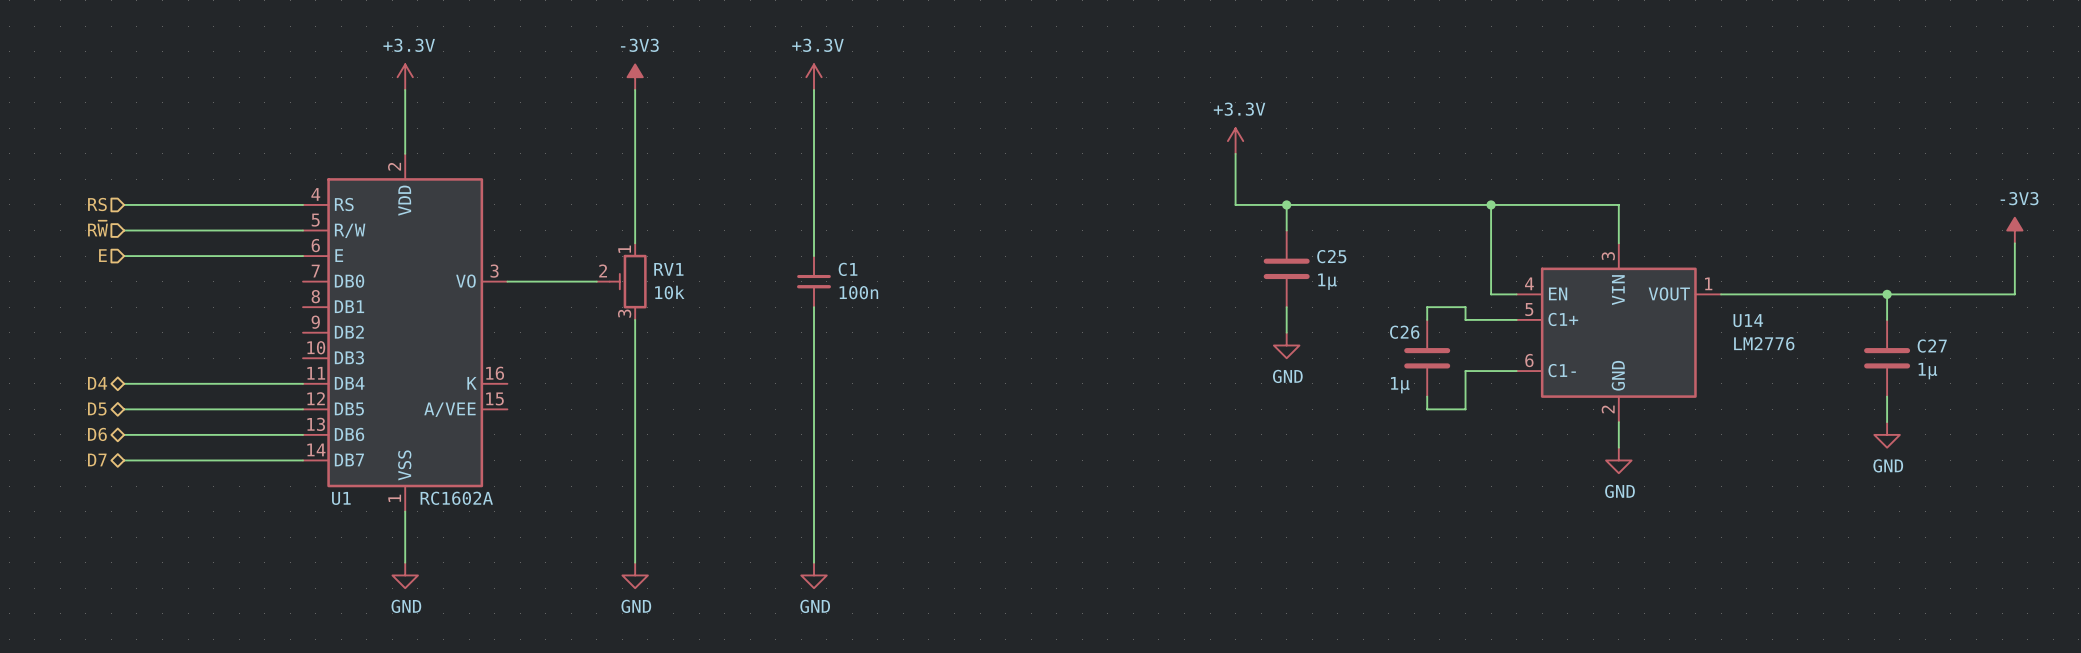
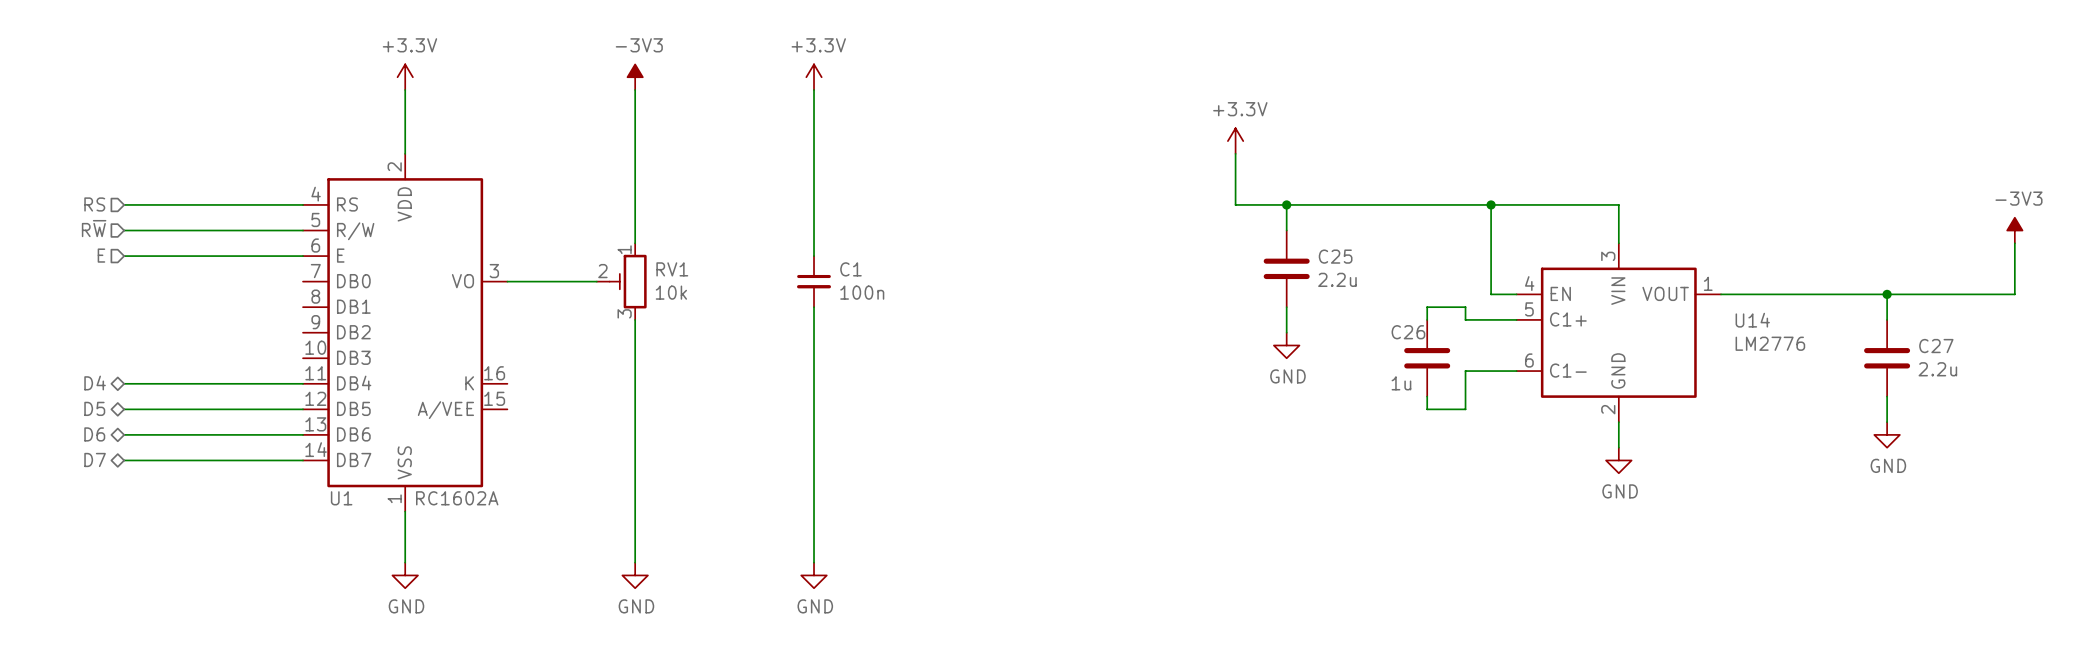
C25 value: 1µ (1327, 281) -> 2.2u (1337, 279)
C27 value: 1µ (1927, 371) -> 2.2u (1937, 369)
C26 value: 1µ (1400, 385) -> 1u (1401, 383)

